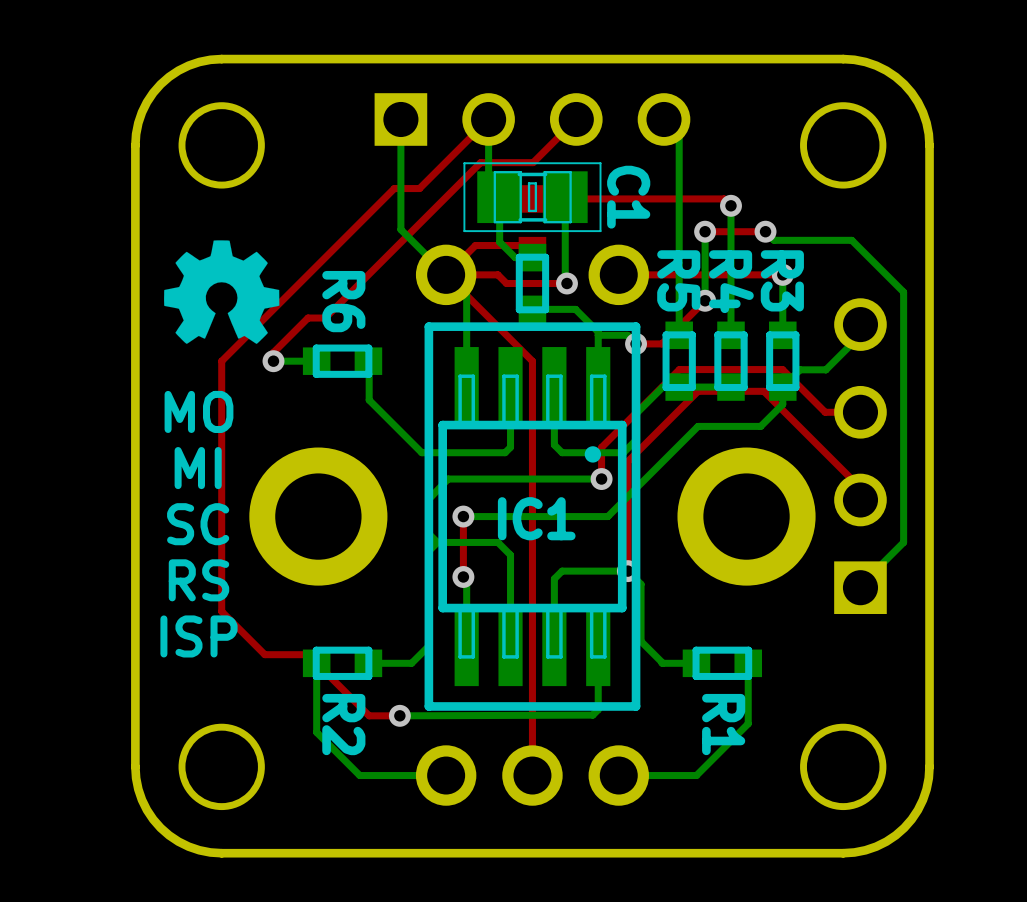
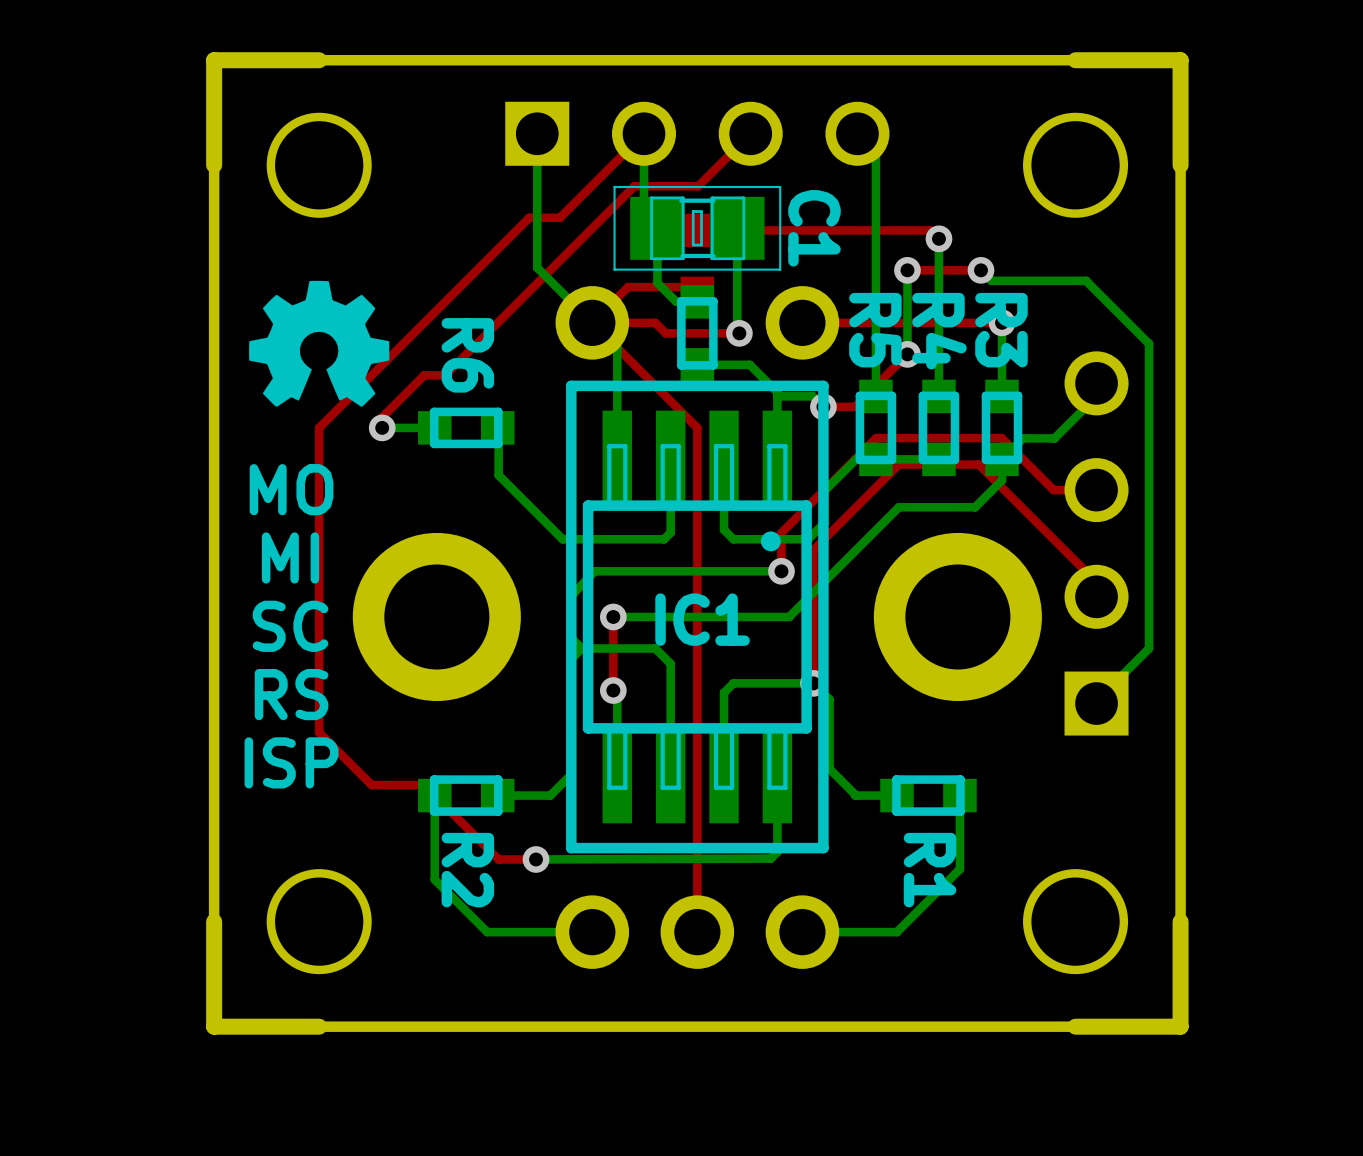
board edge: (221, 59) (188, 65) (160, 84) (141, 112) (135, 145) -> (319, 60) (214, 60) (214, 165)
board edge: (843, 59) (876, 65) (904, 84) (922, 112) (929, 145) -> (1075, 60) (1180, 60) (1180, 165)
board edge: (135, 766) (141, 799) (160, 827) (188, 846) (221, 853) -> (214, 921) (214, 1026) (319, 1026)
board edge: (929, 766) (922, 799) (904, 827) (876, 846) (843, 853) -> (1180, 921) (1180, 1026) (1075, 1026)

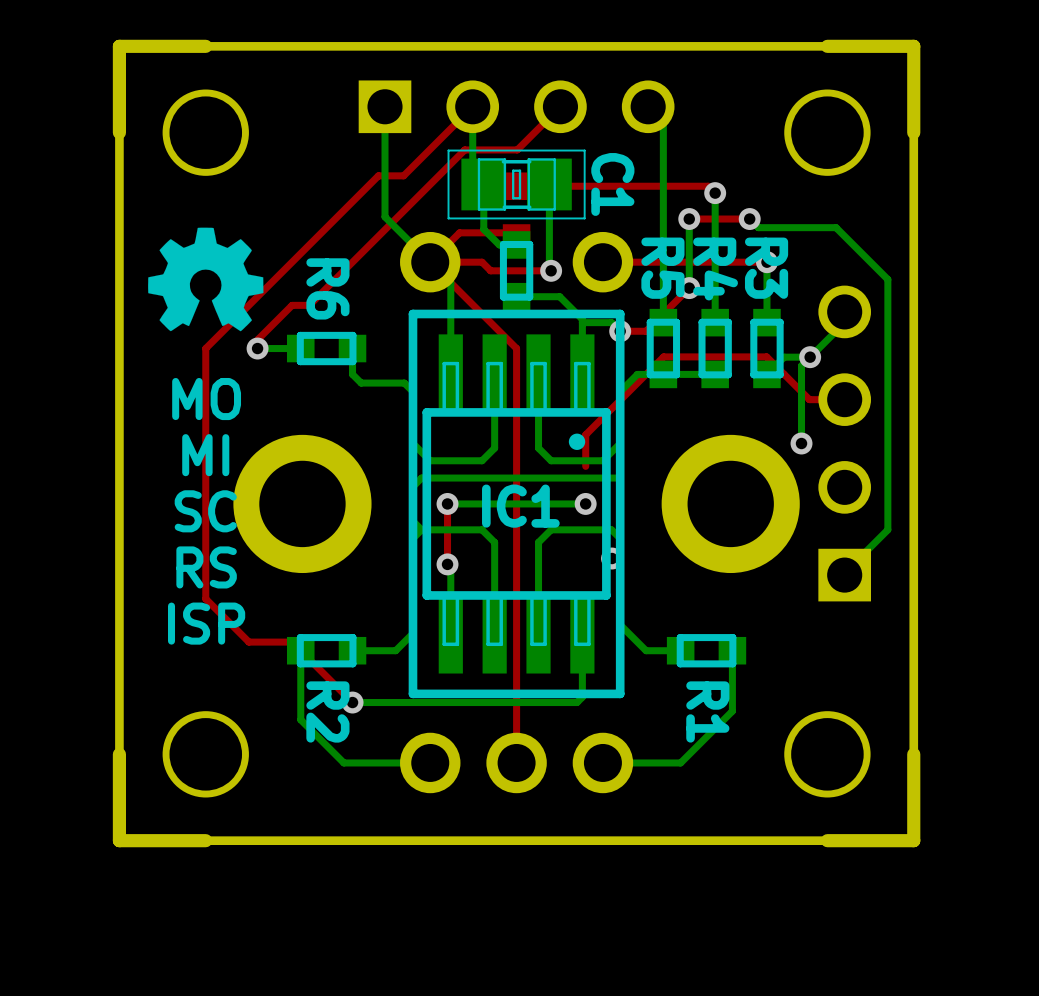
bottom track: (497, 427) (498, 475) (562, 539) (664, 539) (670, 532) -> (352, 348) (352, 374) (361, 383) (404, 383) (412, 391) (412, 443) (430, 460) (482, 460) (494, 448) (494, 434)
bottom track: none -> (810, 357) (801, 365) (801, 443)
via: none -> (810, 357)
bottom track: (856, 459) (824, 491) (824, 523) (808, 539) (733, 539) (724, 529) -> (647, 374) (637, 374) (620, 391) (620, 443) (602, 460) (551, 460) (538, 448) (538, 432)
bottom track: (1002, 459) (1002, 480) (975, 507) (898, 507) (789, 616) (781, 616) -> none
text position: MO (291, 489) -> MO (206, 399)
via: none -> (801, 443)
text position: MI (290, 557) -> MI (205, 455)
bottom track: (781, 571) (594, 571) (571, 595) -> (620, 478) (421, 478) (412, 486)
via position: (781, 571) -> (585, 503)
top track: (1096, 596) (1096, 582) (978, 464) (898, 464) (813, 549) (813, 683) -> none
text position: SC (290, 626) -> SC (205, 511)
bottom track: (724, 692) (733, 683) (813, 683) (829, 699) (829, 768) (856, 795) -> (538, 566) (538, 542) (551, 529) (611, 529) (620, 538) (620, 624) (646, 650)
text position: RS (291, 694) -> RS (206, 567)
text position: ISP (291, 762) -> ISP (206, 623)
top track: (497, 858) (536, 859) -> none
bottom track: (770, 858) (536, 859) -> (577, 702) (352, 702)
via position: (536, 859) -> (352, 702)

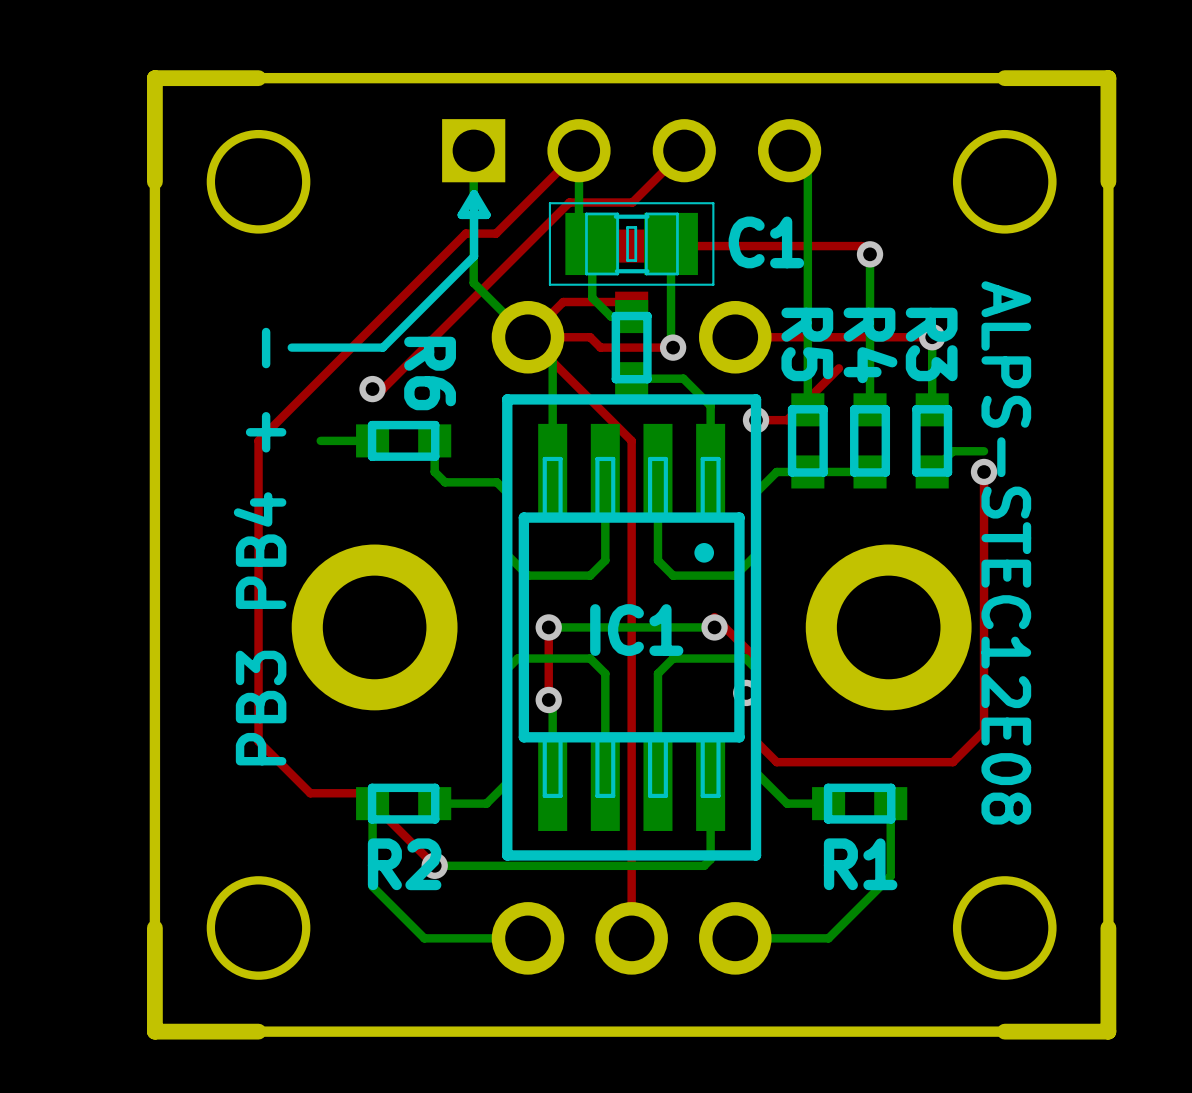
line: none -> (474, 194) (461, 214) (486, 214) (474, 194)
line: none -> (474, 194) (474, 256) (382, 347) (291, 347)
C1 name rotation: 0° (612, 184) -> 90° counterclockwise (766, 242)
bottom track: (689, 219) (689, 288) -> none
via: (689, 219) -> none
bottom track: (749, 219) (758, 227) (836, 227) (887, 279) (887, 529) (844, 575) -> none
top track: (749, 219) (689, 219) -> none
via: (749, 219) -> none
drawing: [148, 227, 264, 332] -> none
R6 name position: R6 (327, 288) -> R6 (430, 373)
via: (689, 288) -> none
top track: (300, 305) (292, 305) (257, 339) (257, 348) -> none
bottom track: (844, 311) (844, 322) (801, 365) (801, 443) -> none
bottom track: (582, 322) (611, 322) (620, 331) -> none
via position: (257, 348) -> (372, 389)
via position: (810, 357) -> (984, 471)
top track: none -> (984, 471) (984, 731) (952, 762) (776, 762) (756, 741) (756, 658) (714, 617)
text: MO (206, 399) -> none
top track: (844, 399) (809, 399) (766, 356) (663, 356) (585, 434) (585, 466) -> none
text: none -> PB3 PB4 + - (260, 546)
text: none -> ALPS-STEC12E08 (1006, 552)
via: (801, 443) -> none
part: (844, 443) -> none
text: MI (205, 455) -> none
bottom track: (620, 478) (421, 478) (412, 486) (412, 521) (421, 529) -> none
text: SC (205, 511) -> none
text: RS (206, 567) -> none
text: ISP (206, 623) -> none
R2 name rotation: 0° (327, 711) -> 90° counterclockwise (404, 864)
R1 name rotation: 0° (707, 711) -> 90° counterclockwise (860, 864)

